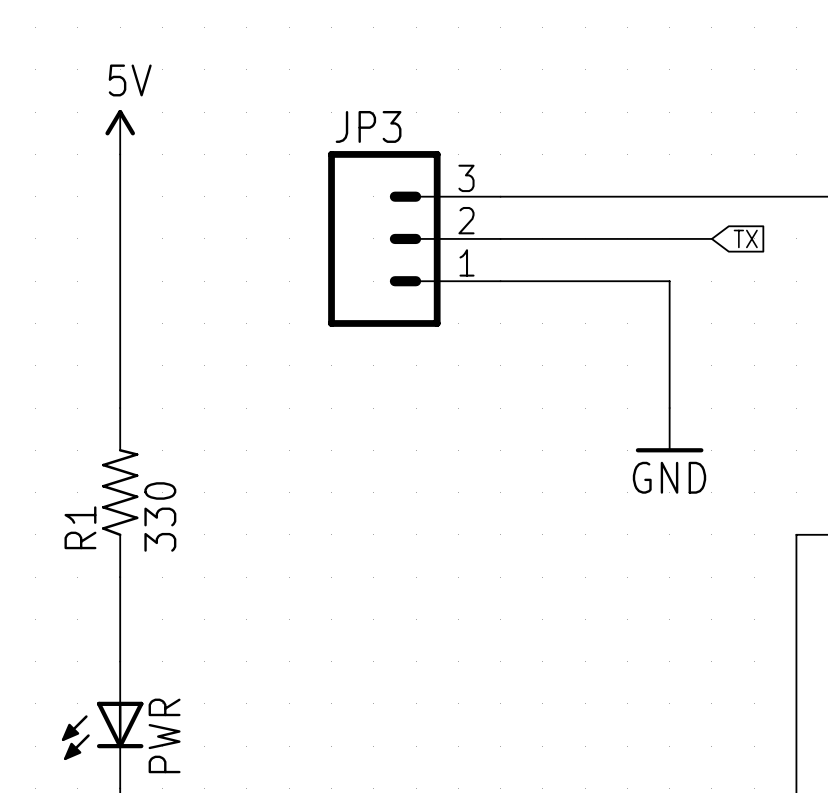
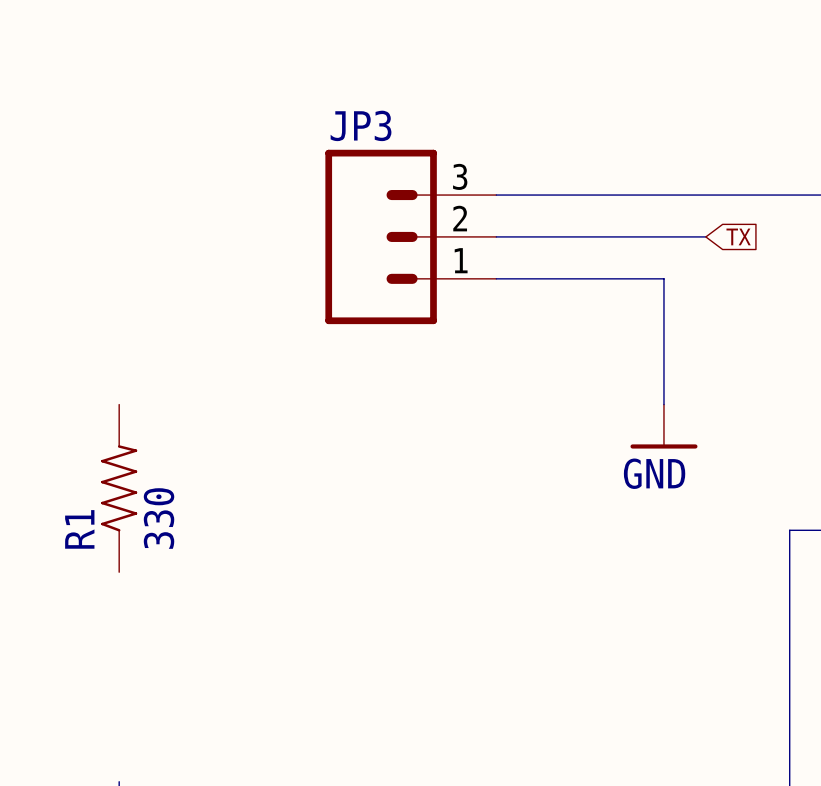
power symbol: 5V (120, 132) -> none
wire: (120, 154) (120, 408) -> none
wire: (120, 577) (120, 661) -> none
PWR: (102, 725) -> none

